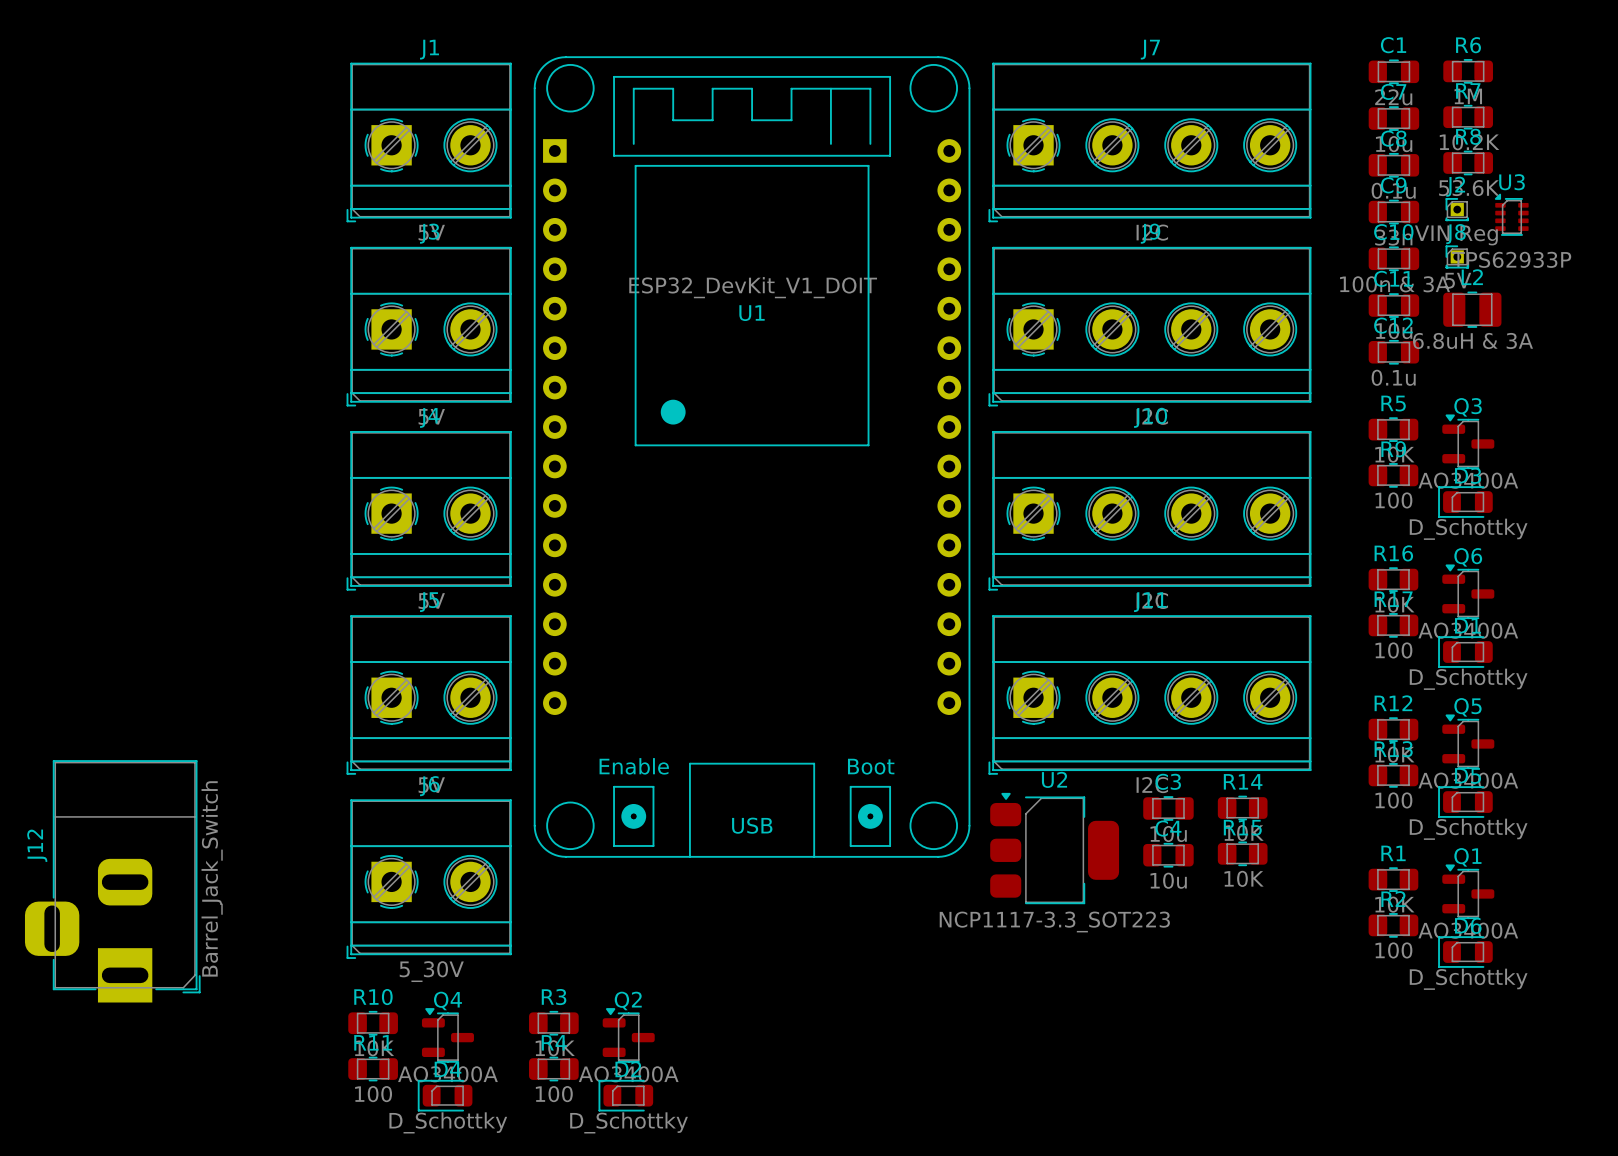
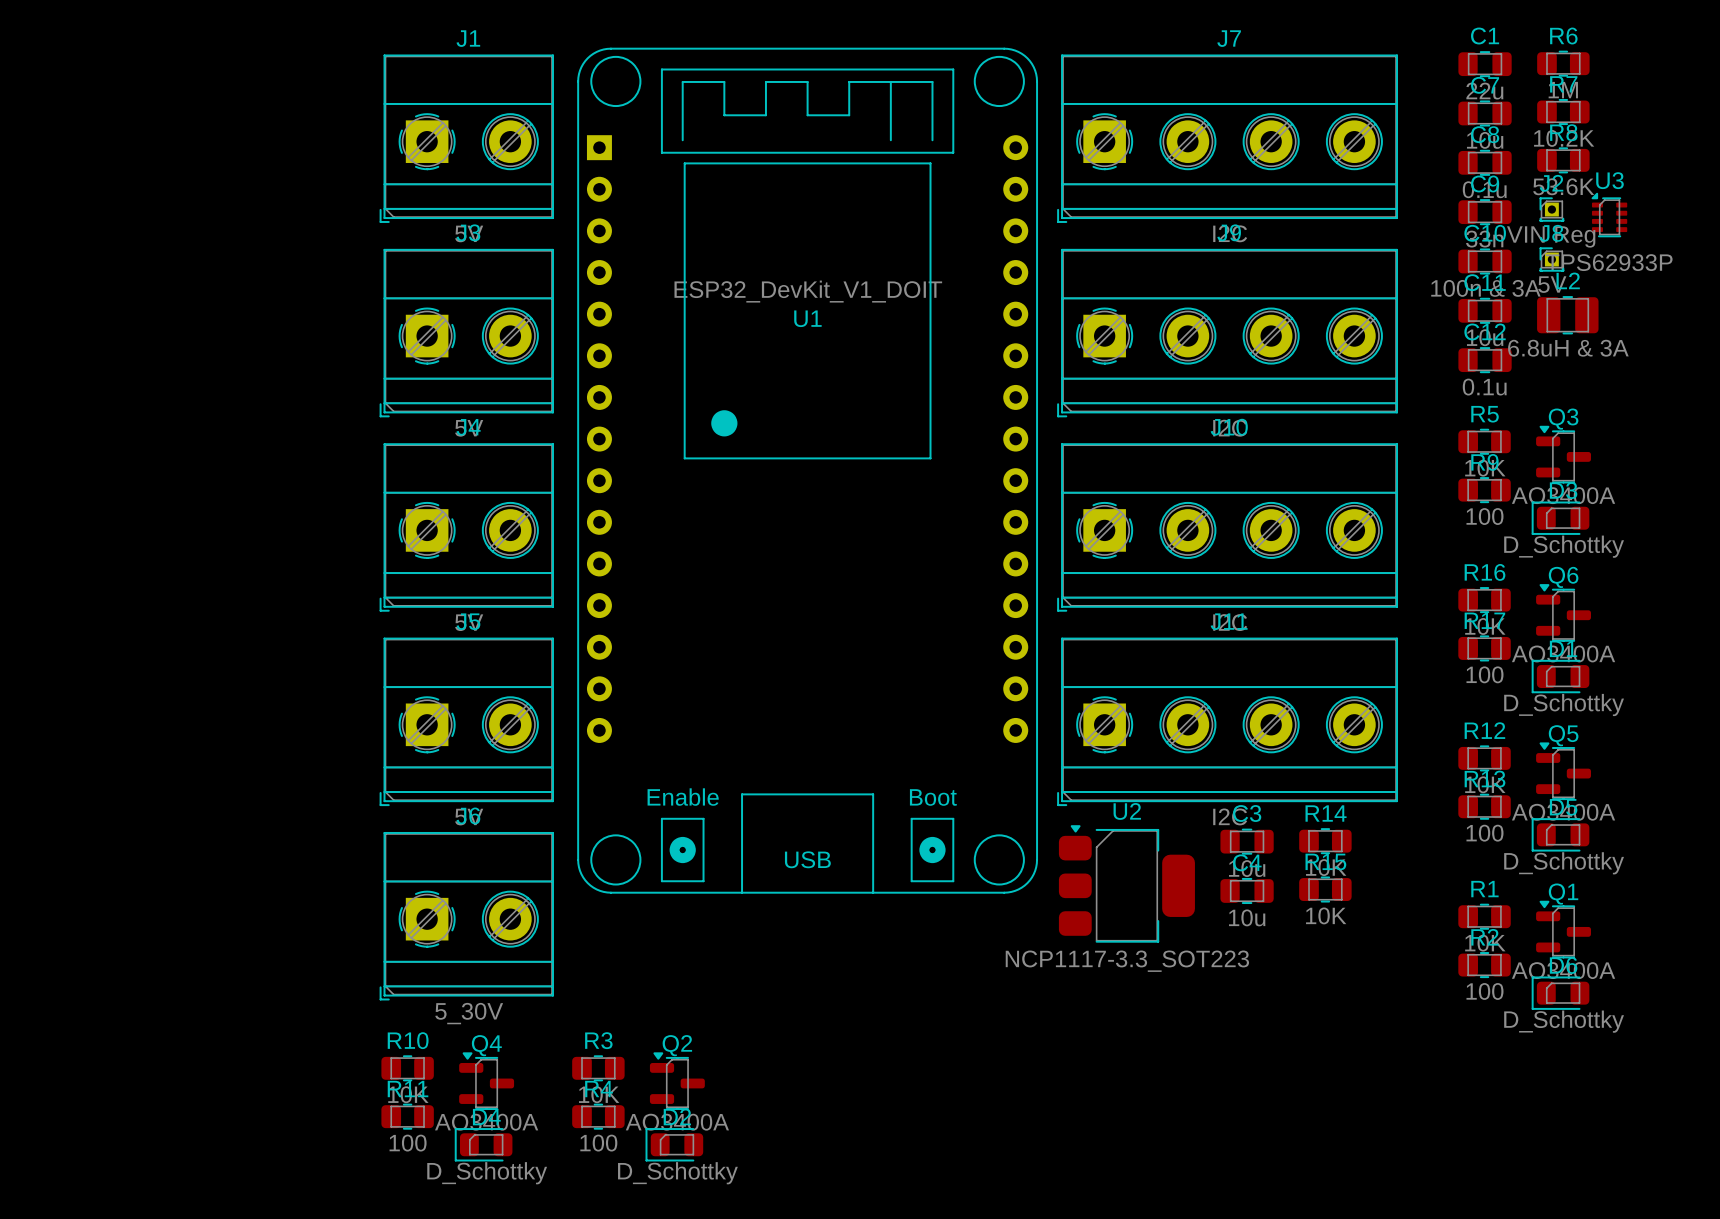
J12: Barrel_Jack_Switch (112, 881) -> none

